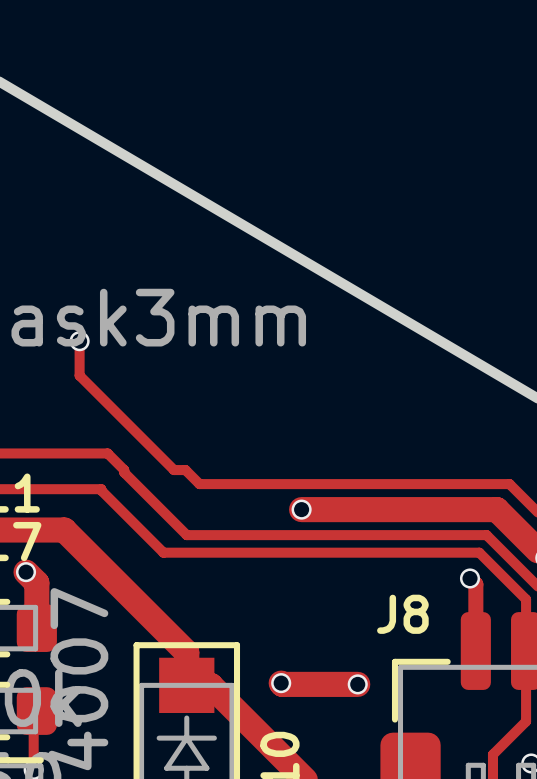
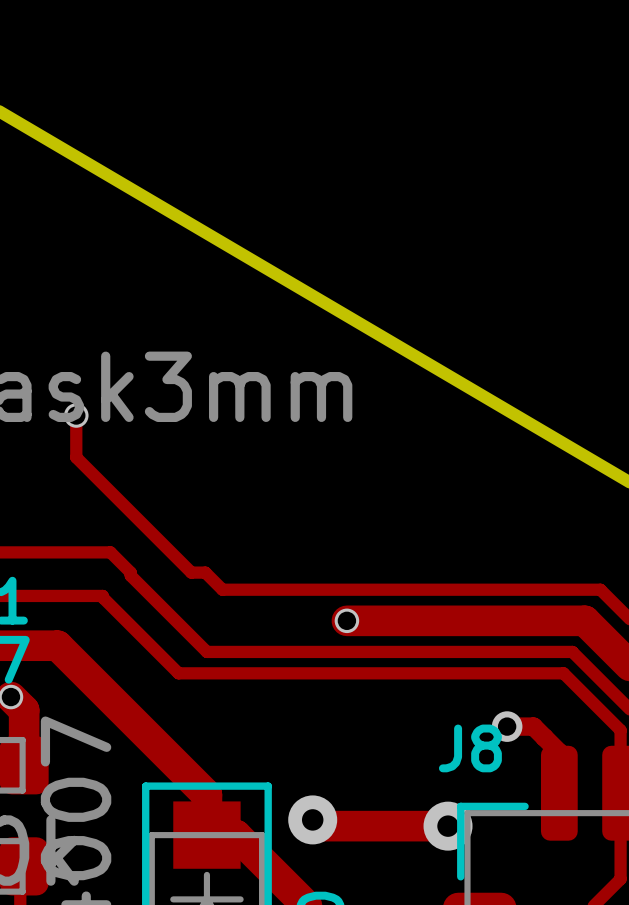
track: (470, 578) (475, 584) (475, 617) -> (507, 726) (533, 726) (559, 752)
via: (470, 578) -> none
via: none -> (507, 726)
track: none -> (312, 819) (318, 826) (448, 826)
via size: [271, 673, 292, 694] -> [288, 795, 338, 845]
via size: [347, 674, 368, 695] -> [423, 801, 473, 851]
track: (281, 683) (357, 684) -> none

